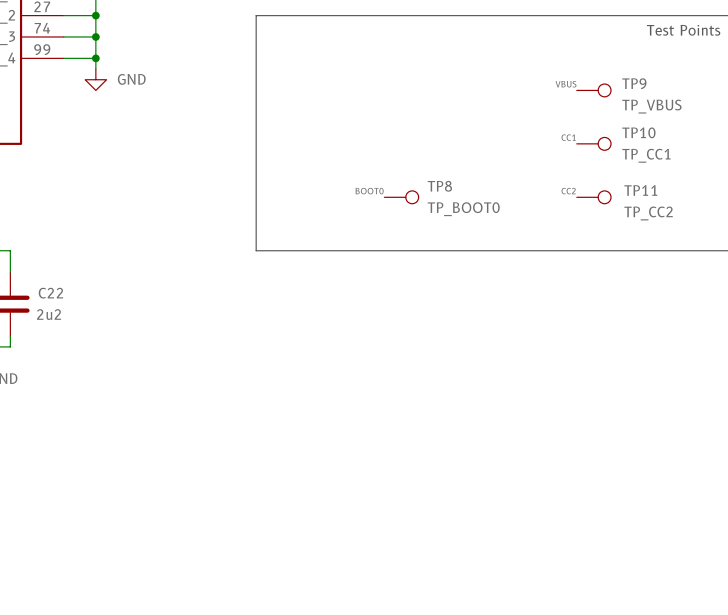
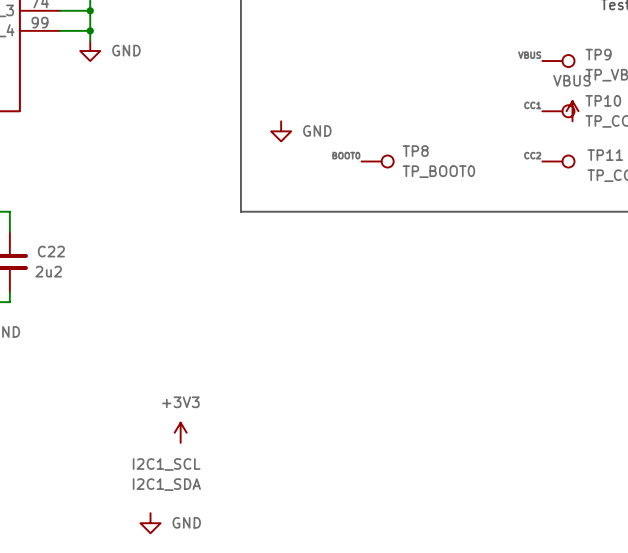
power symbol: none -> VBUS (572, 111)
power symbol: none -> GND (281, 131)
power symbol: none -> +3V3 (180, 432)
label: none -> I2C1_SCL (166, 464)
label: none -> I2C1_SDA (166, 484)
power symbol: none -> GND (150, 523)

